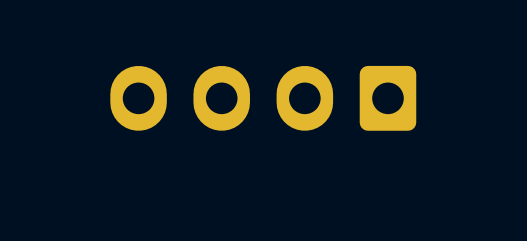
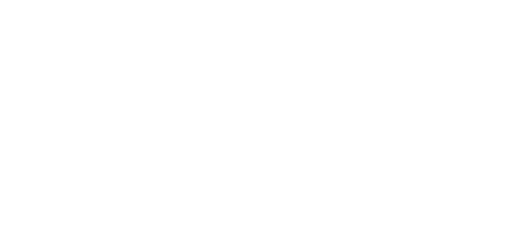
part: (263, 98) -> none

